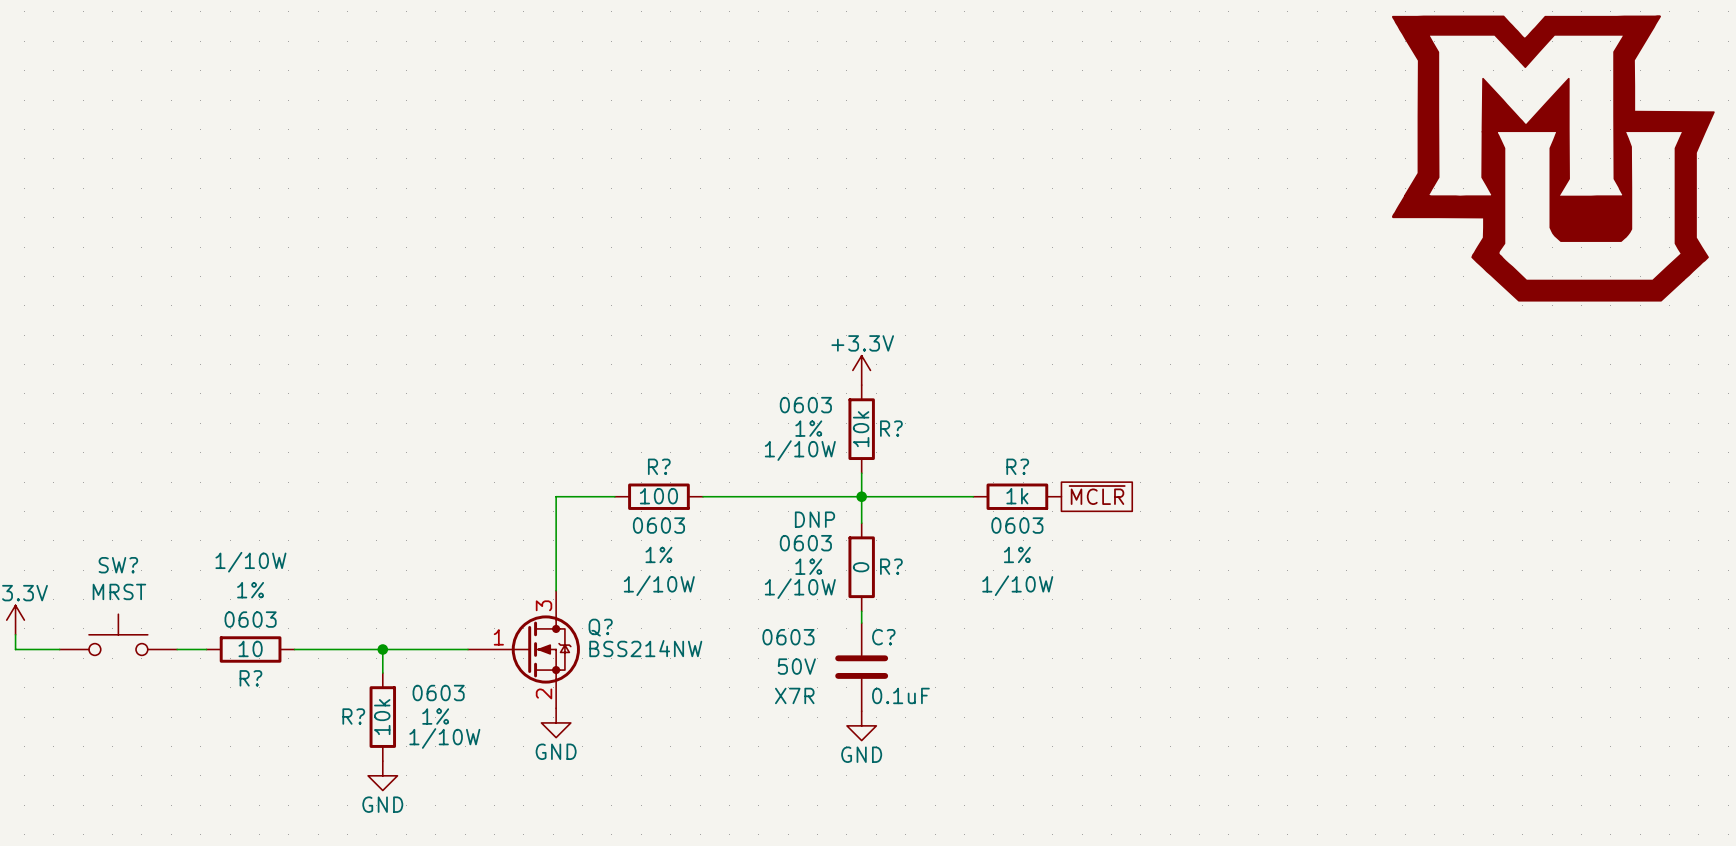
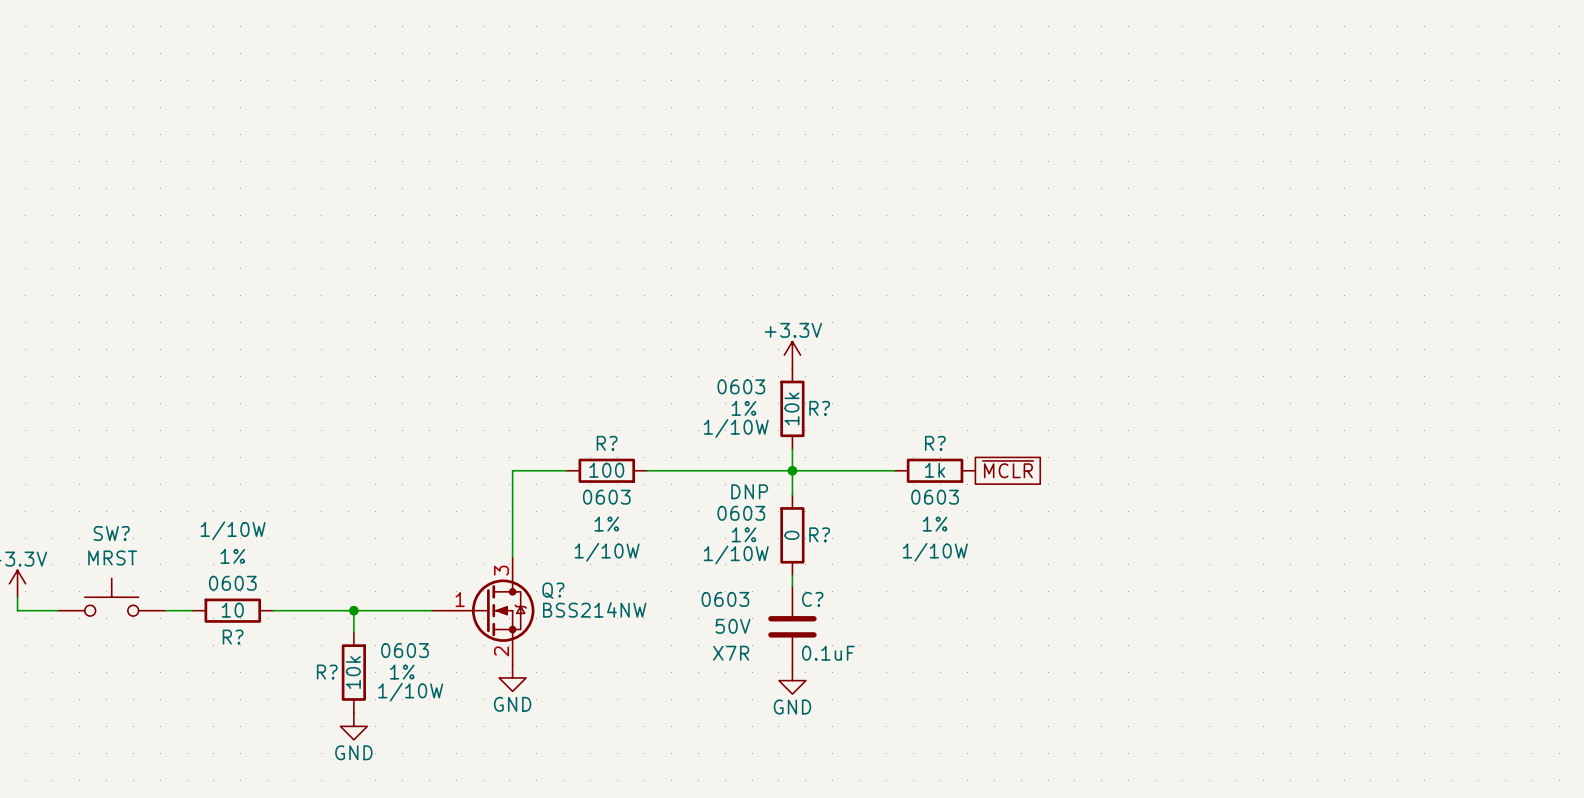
power symbol: (1553, 158) -> none

